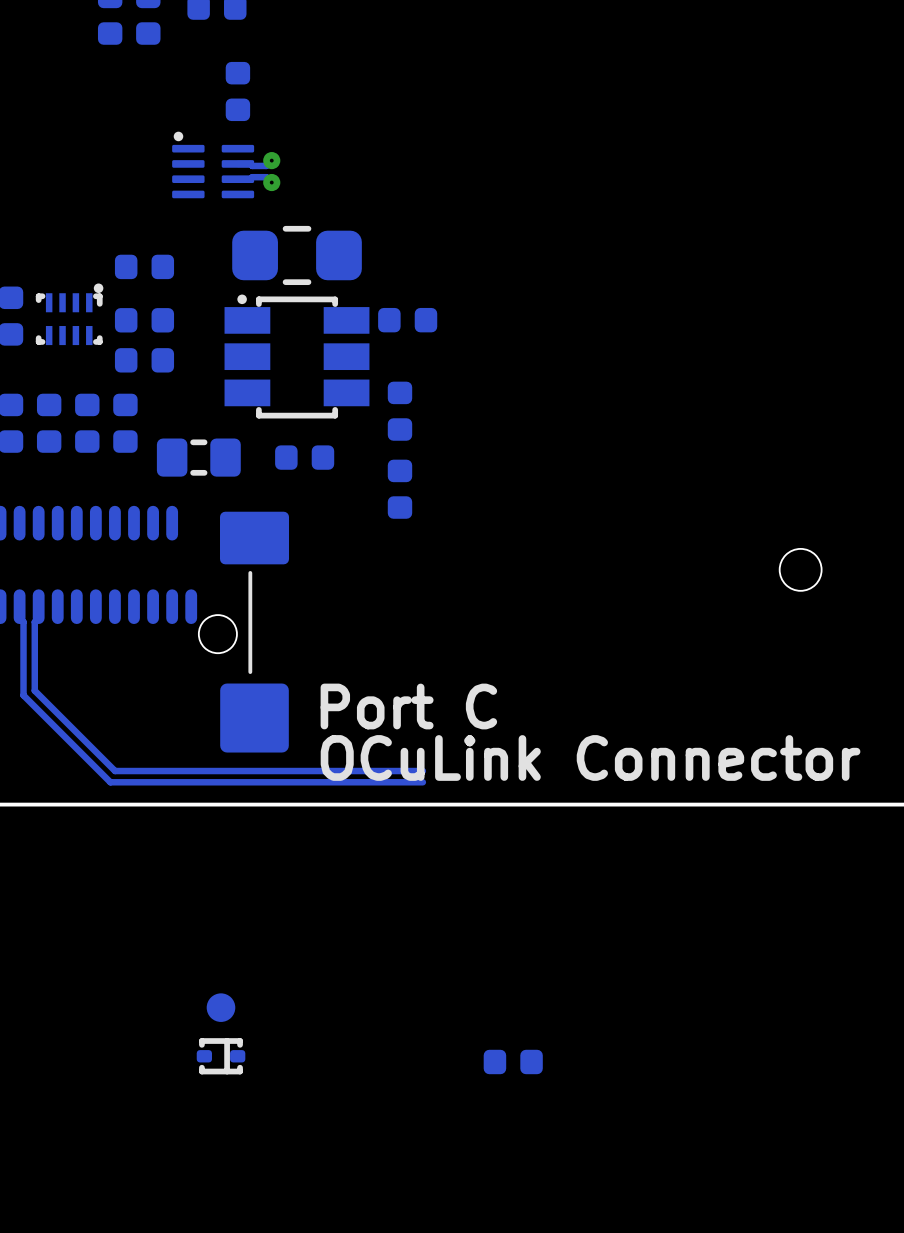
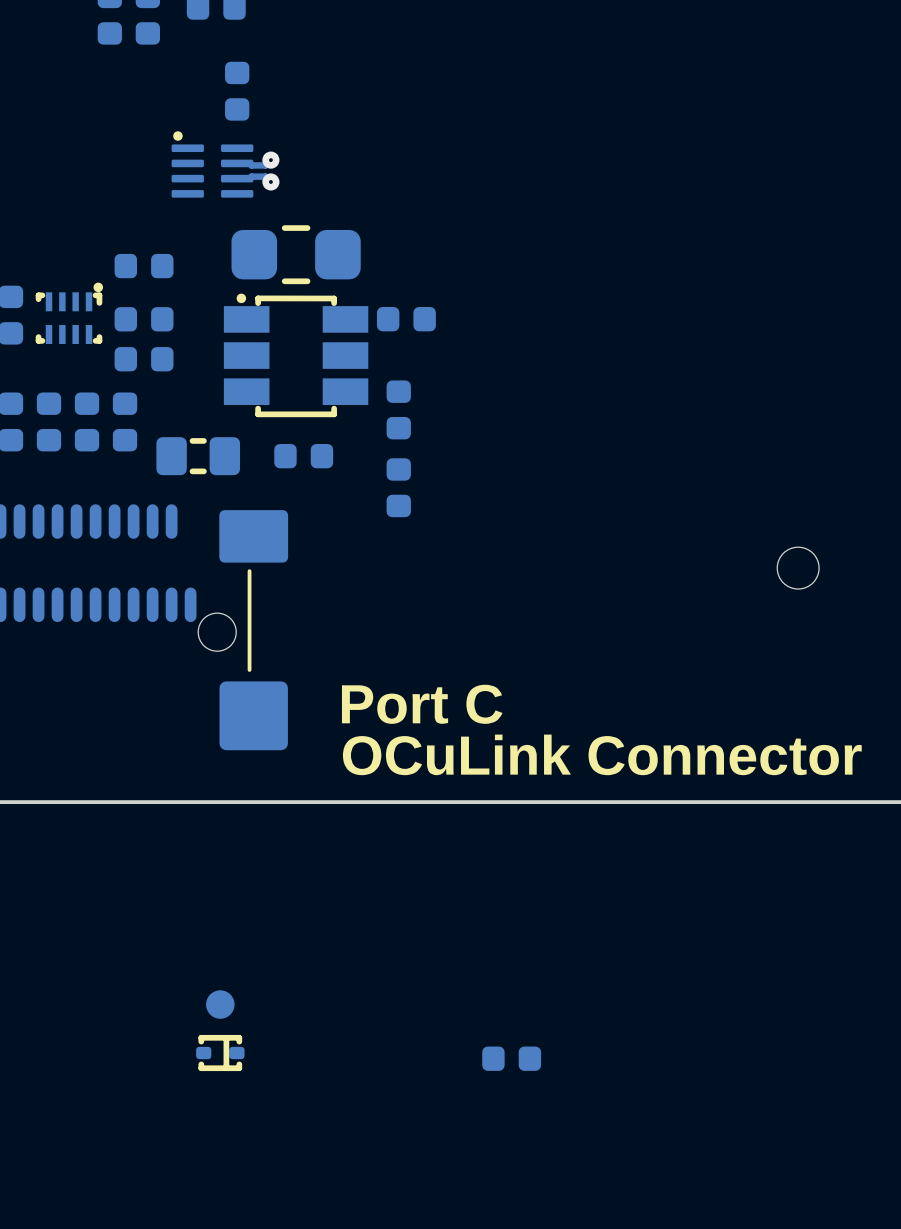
track: (19, 606) (19, 618) (23, 622) (23, 695) (110, 782) (422, 782) -> none
track: (38, 606) (38, 618) (34, 622) (34, 690) (115, 771) (422, 771) -> none

